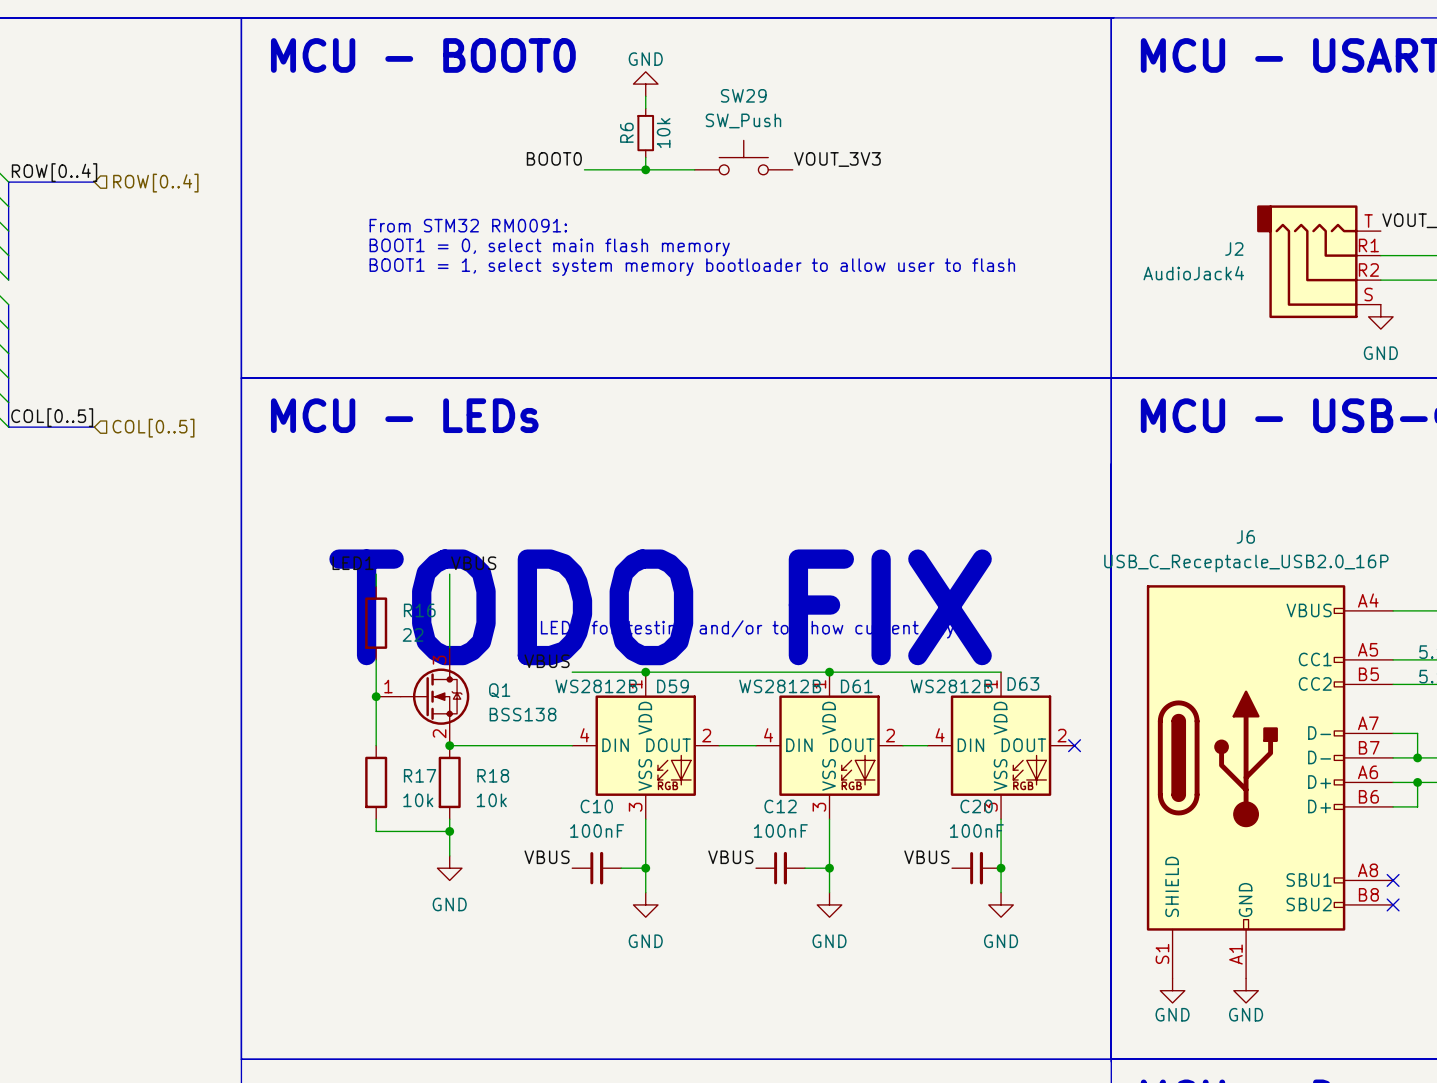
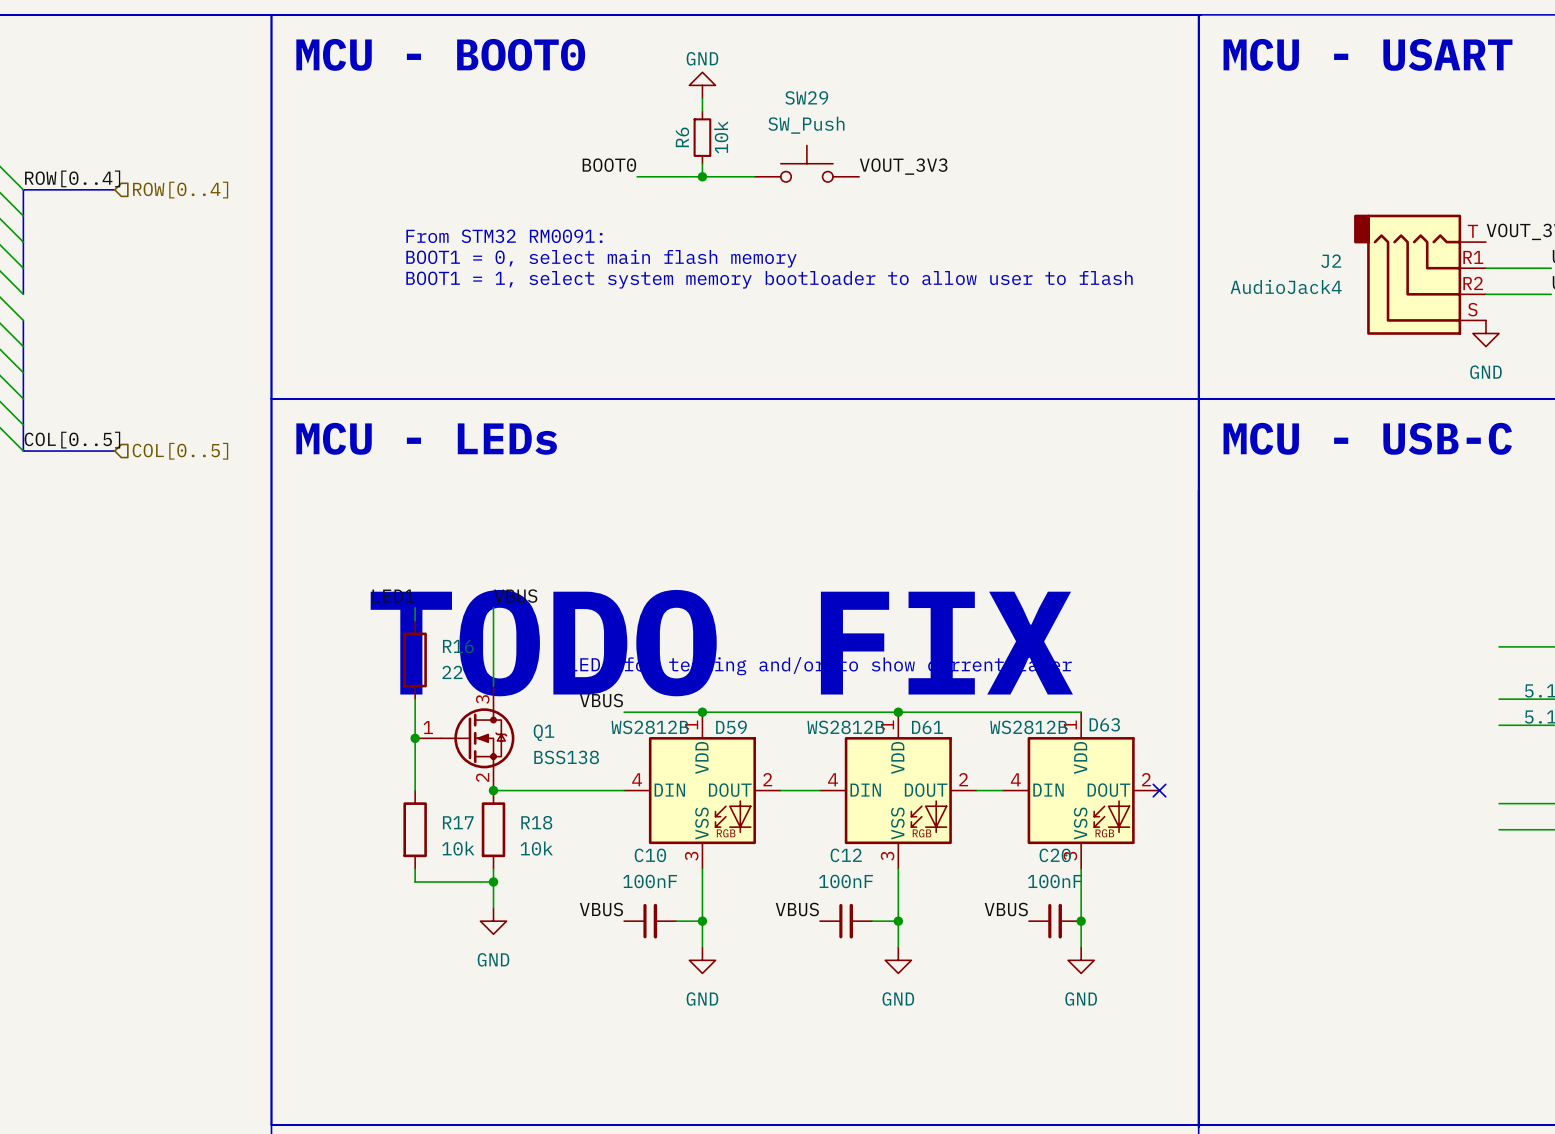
wire: (1393, 733) (1417, 733) (1417, 757) -> none
junction: (1417, 757) -> none
J6: USB_C_Receptacle_USB2.0_16P (1269, 781) -> none
wire: (1417, 782) (1417, 806) (1393, 806) -> none
junction: (1417, 782) -> none
no-connect mark: (1393, 880) -> none
no-connect mark: (1393, 904) -> none
power symbol: GND (1172, 990) -> none
power symbol: GND (1246, 990) -> none

